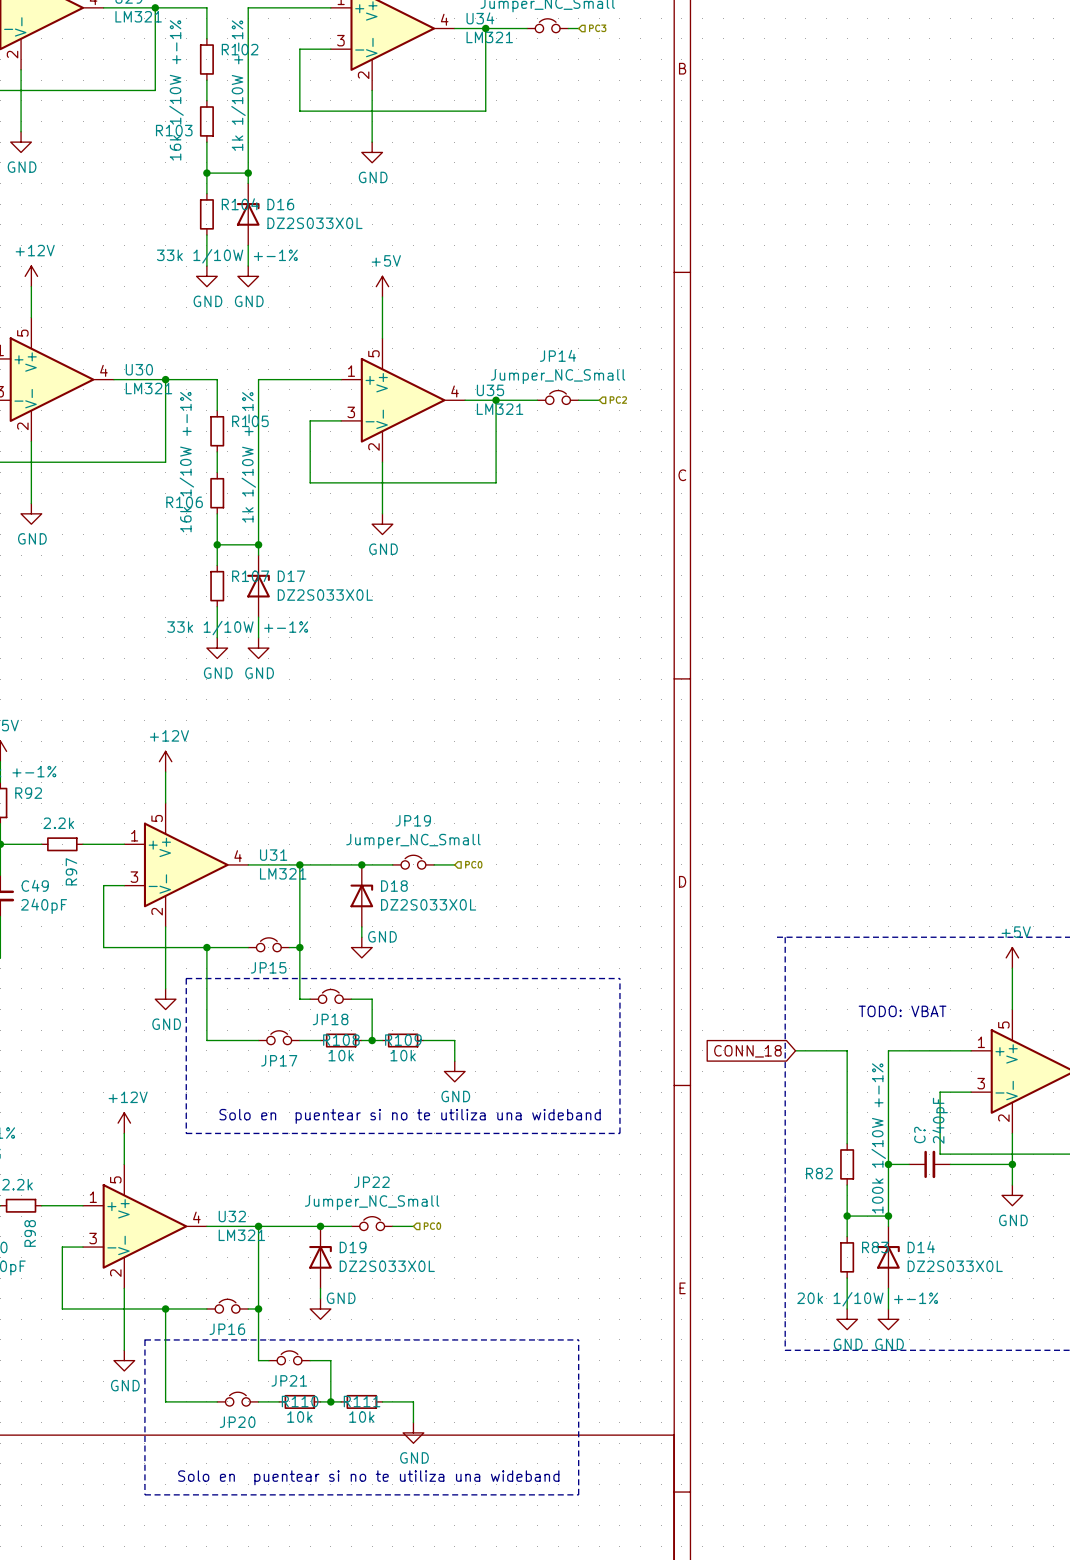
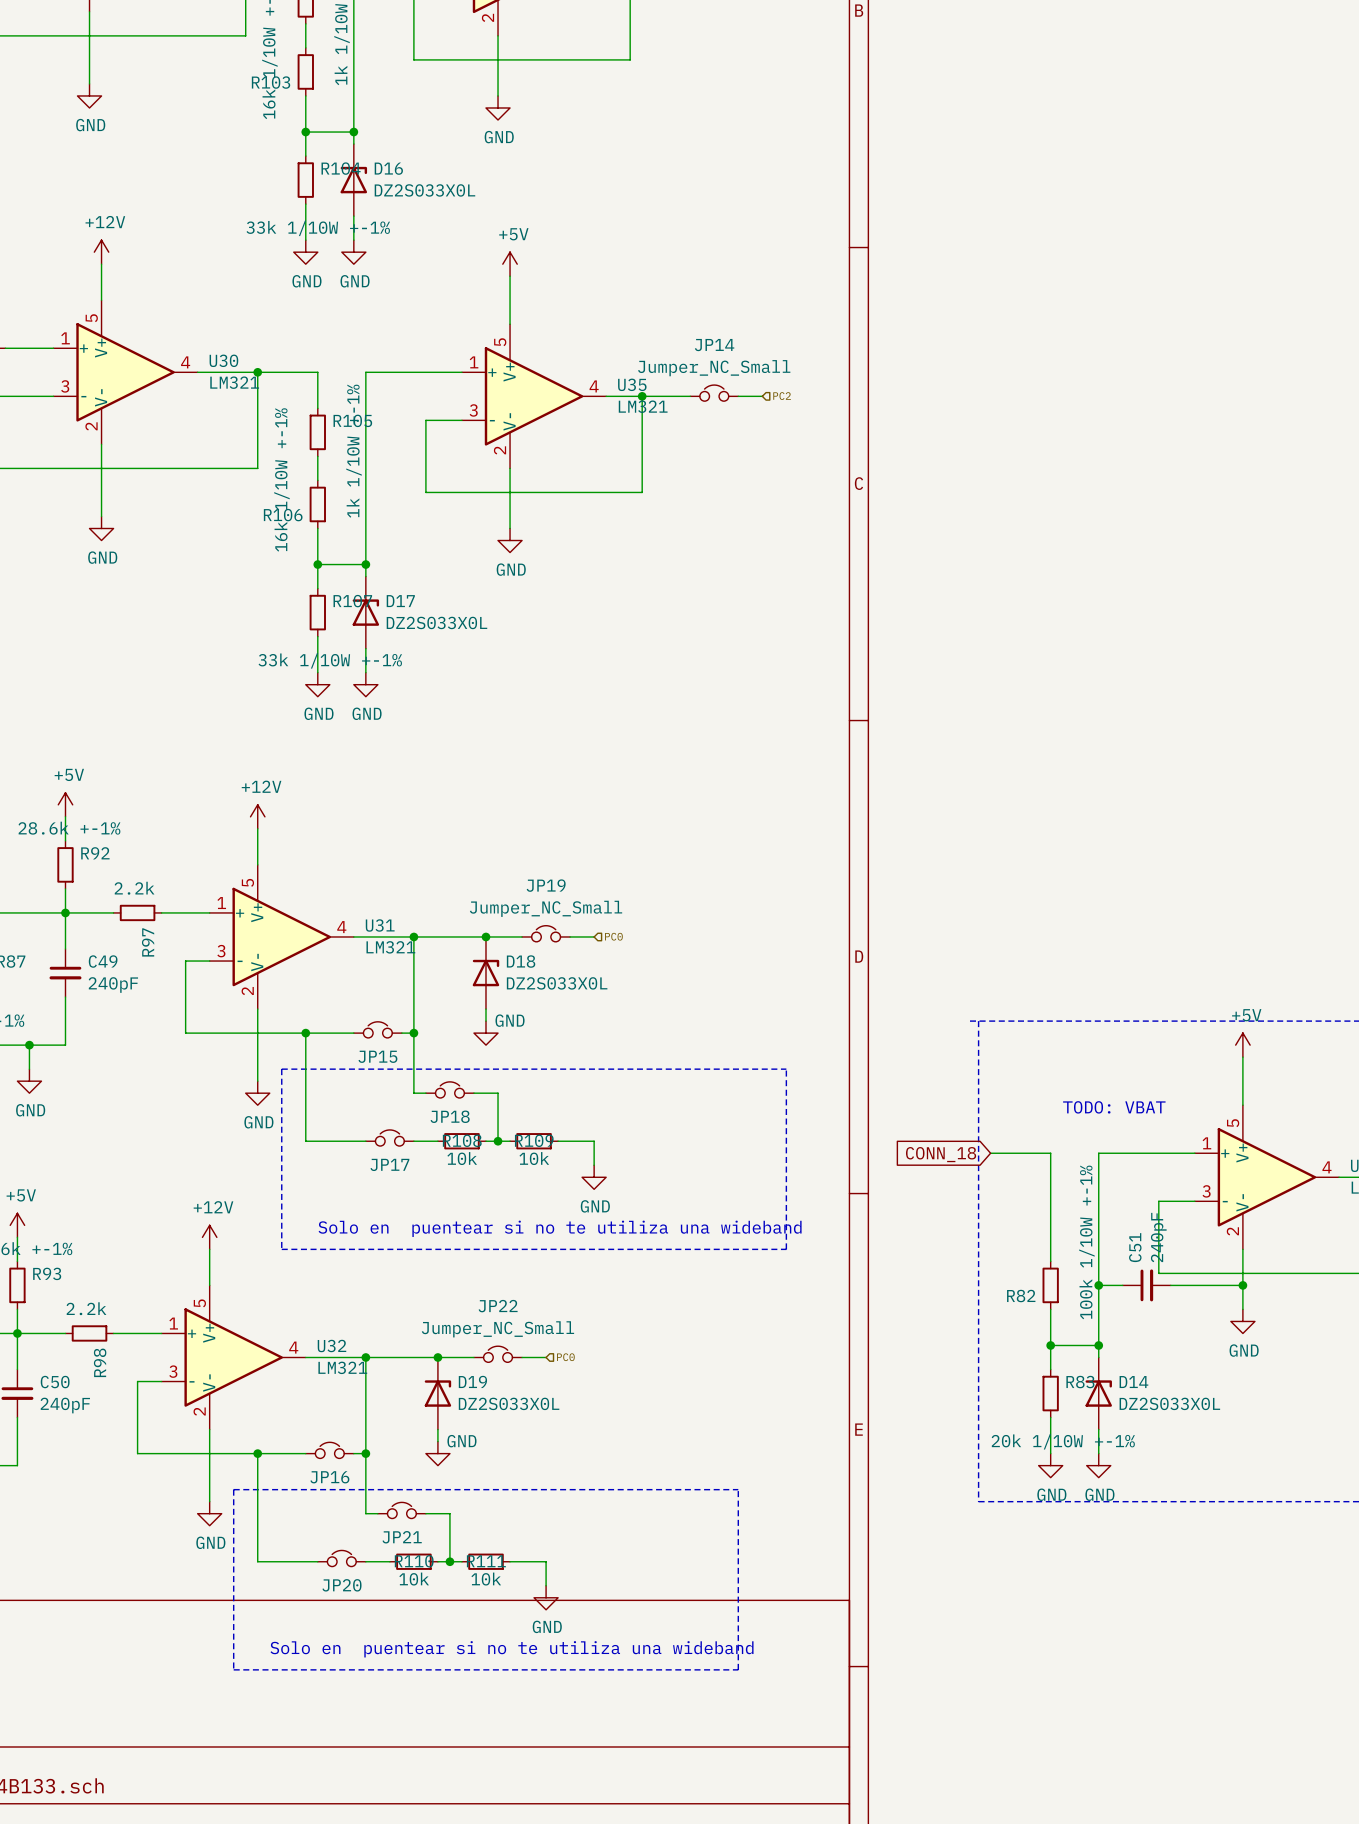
C? name: C? (919, 1135) -> C51 (1135, 1247)

